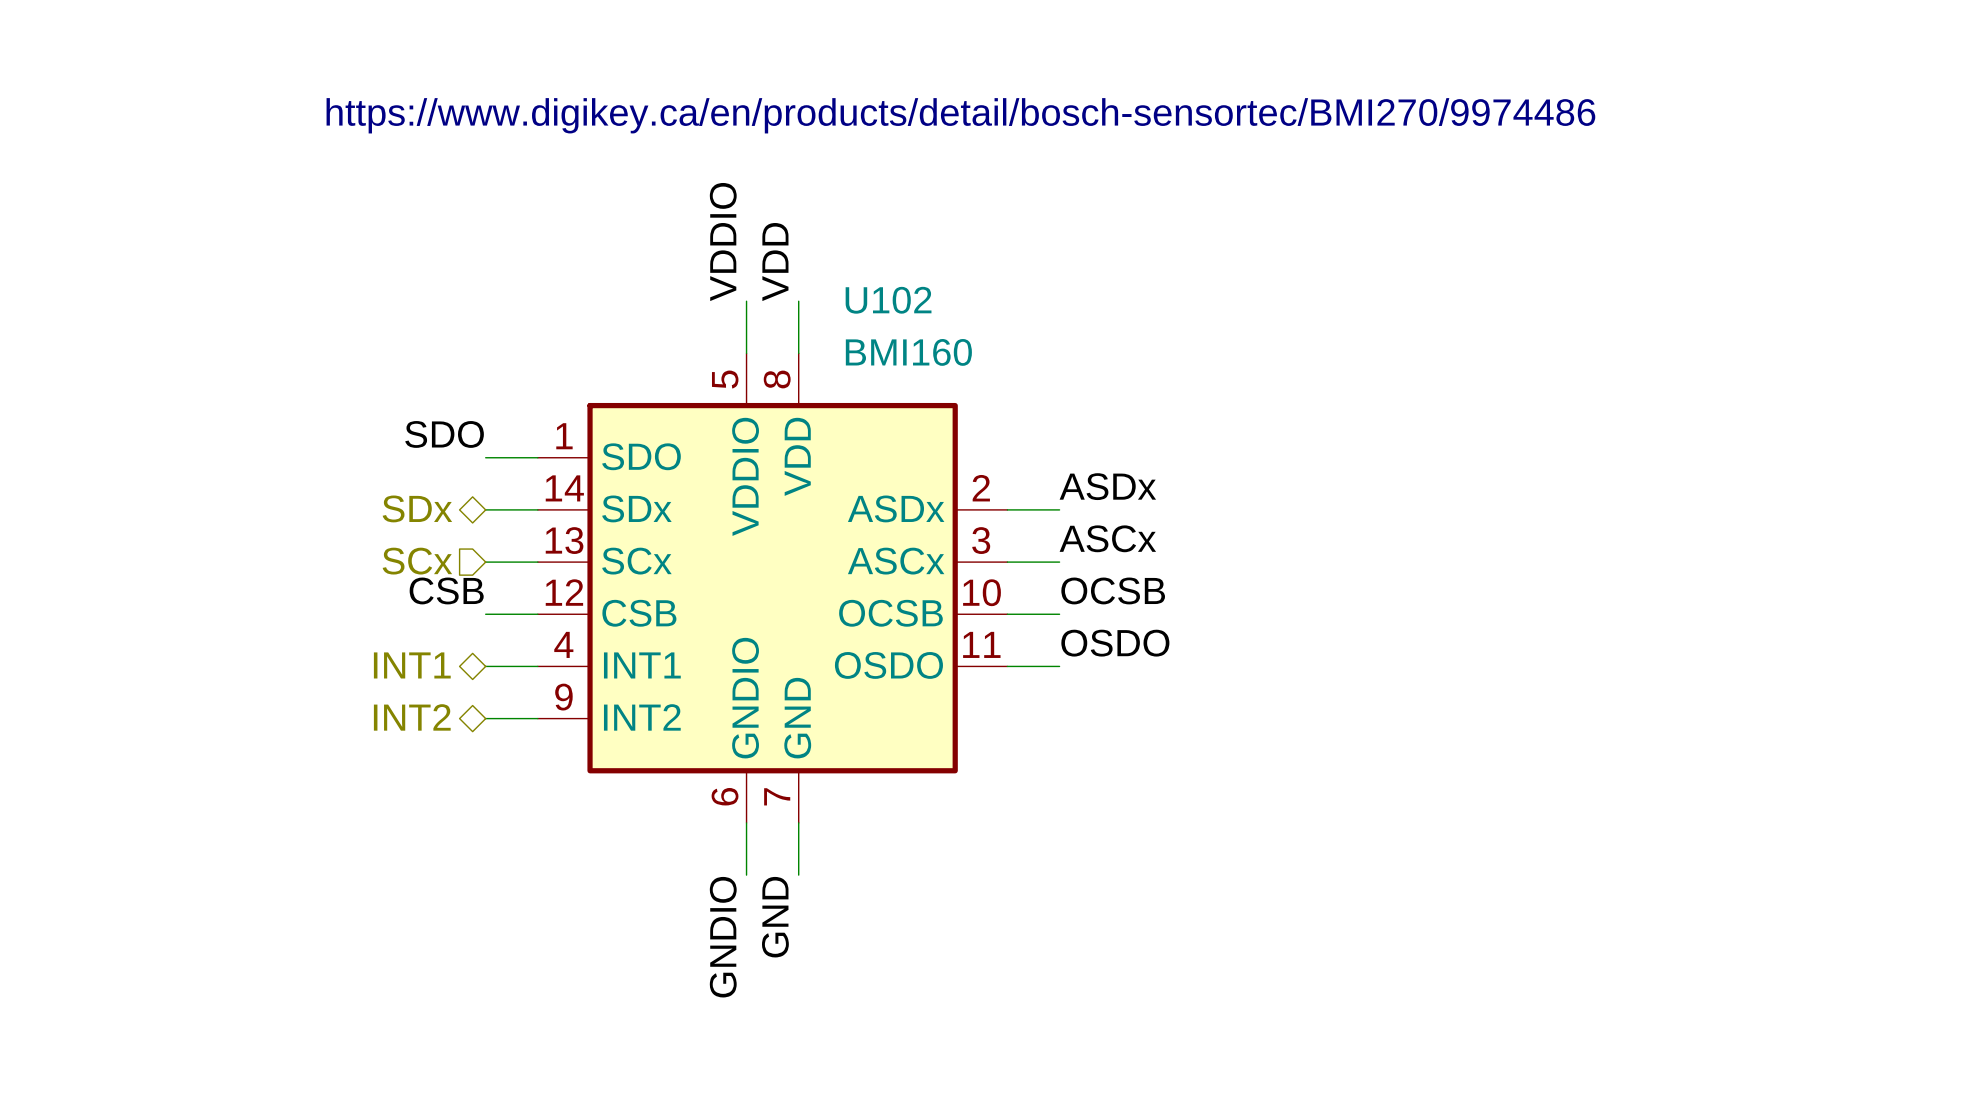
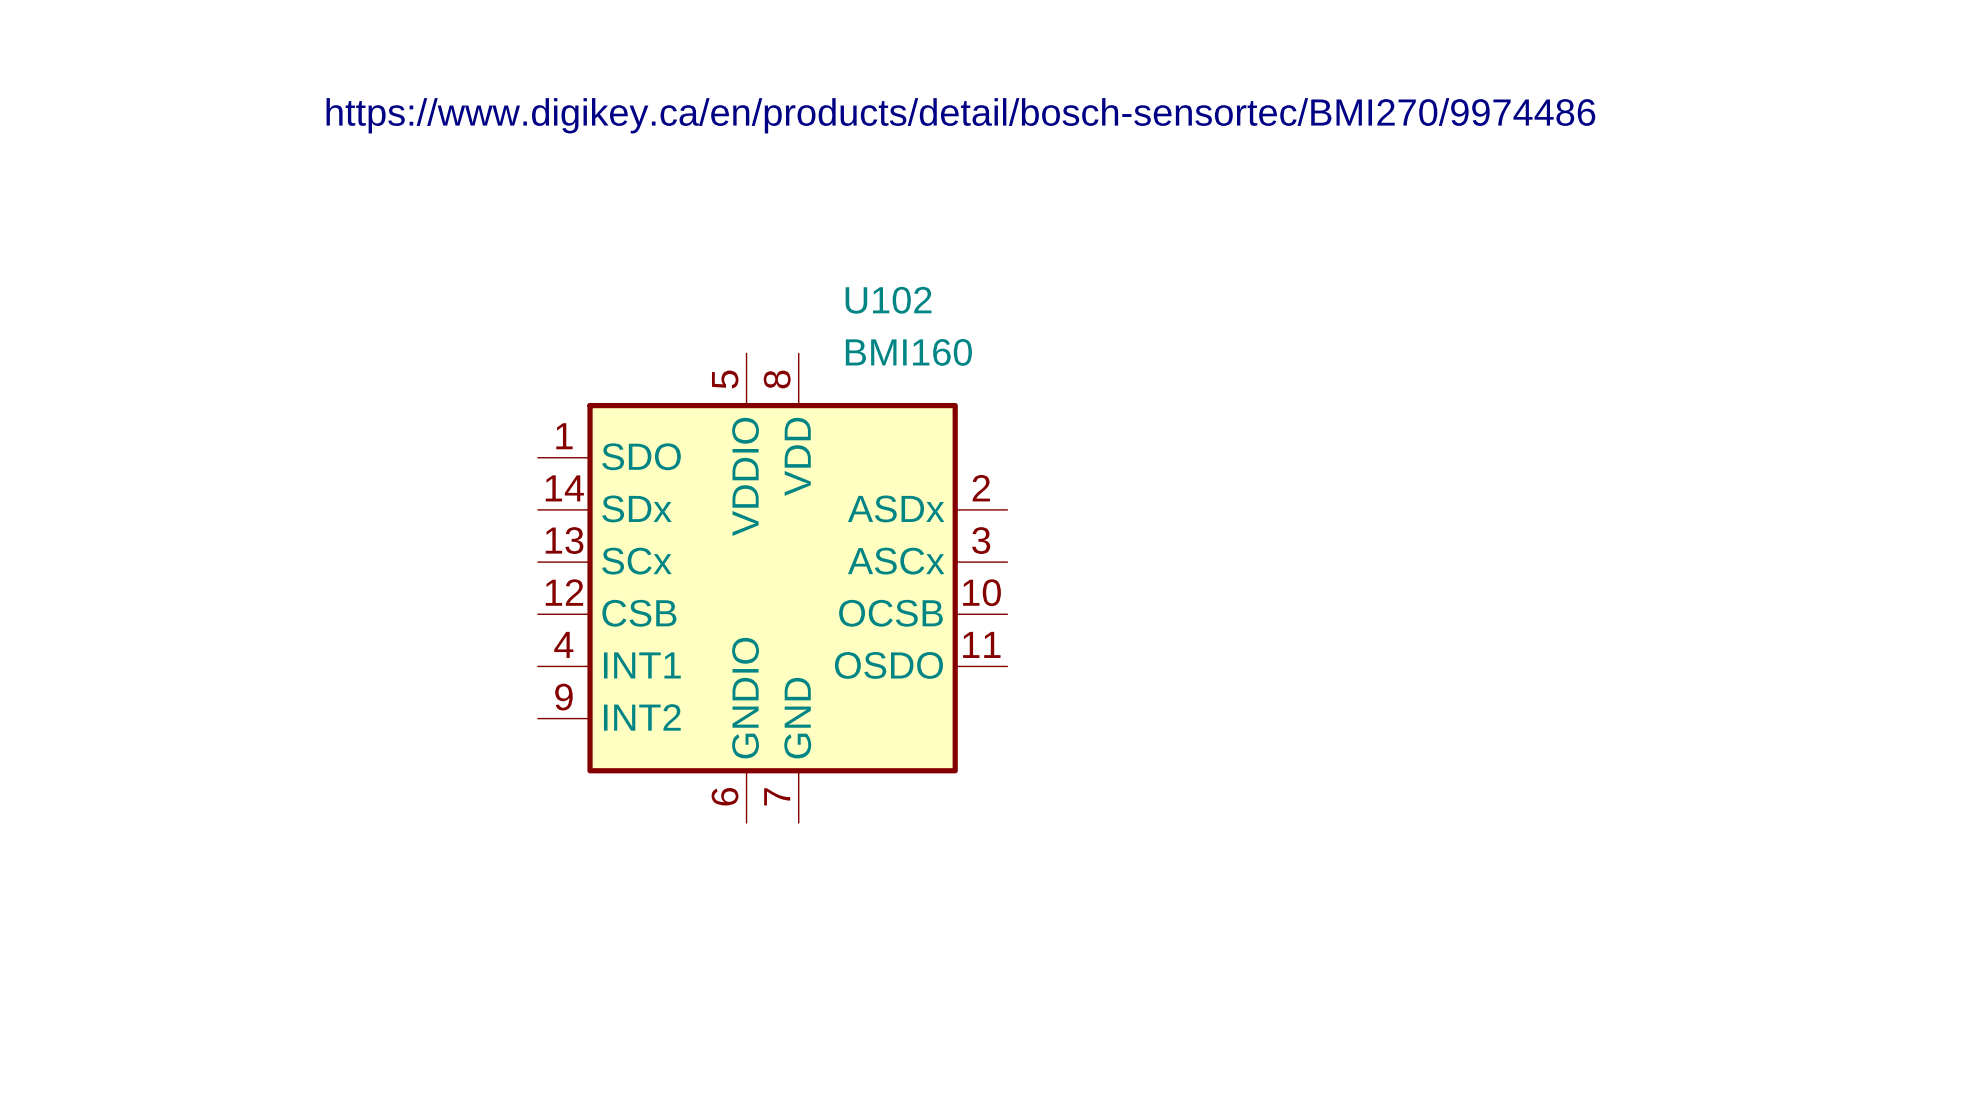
label: VDDIO (723, 242) -> none
label: VDD (775, 262) -> none
wire: (746, 301) (746, 353) -> none
wire: (798, 301) (798, 353) -> none
label: SDO (444, 434) -> none
wire: (485, 457) (537, 457) -> none
label: ASDx (1107, 486) -> none
hierarchical label: SDx (417, 508) -> none
wire: (485, 509) (537, 509) -> none
wire: (1007, 509) (1059, 509) -> none
label: ASCx (1107, 538) -> none
hierarchical label: SCx (417, 561) -> none
wire: (485, 562) (537, 562) -> none
wire: (1007, 562) (1059, 562) -> none
label: CSB (446, 590) -> none
label: OCSB (1113, 590) -> none
wire: (485, 614) (537, 614) -> none
wire: (1007, 614) (1059, 614) -> none
label: OSDO (1115, 643) -> none
hierarchical label: INT1 (412, 665) -> none
wire: (485, 666) (537, 666) -> none
wire: (1007, 666) (1059, 666) -> none
hierarchical label: INT2 (412, 717) -> none
wire: (485, 718) (537, 718) -> none
wire: (746, 822) (746, 875) -> none
wire: (798, 822) (798, 875) -> none
label: GND (775, 917) -> none
label: GNDIO (723, 937) -> none

